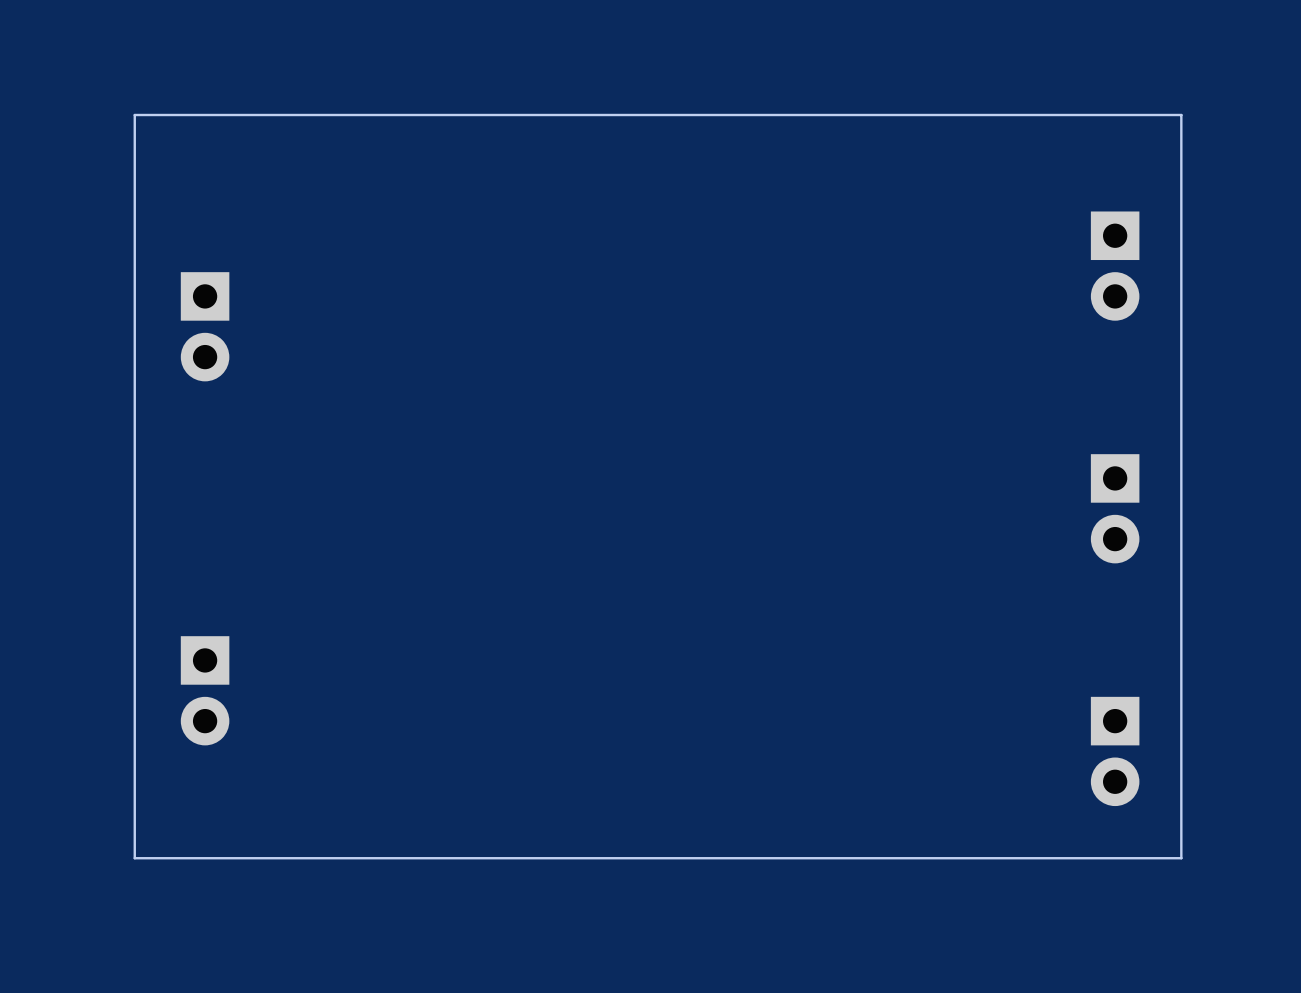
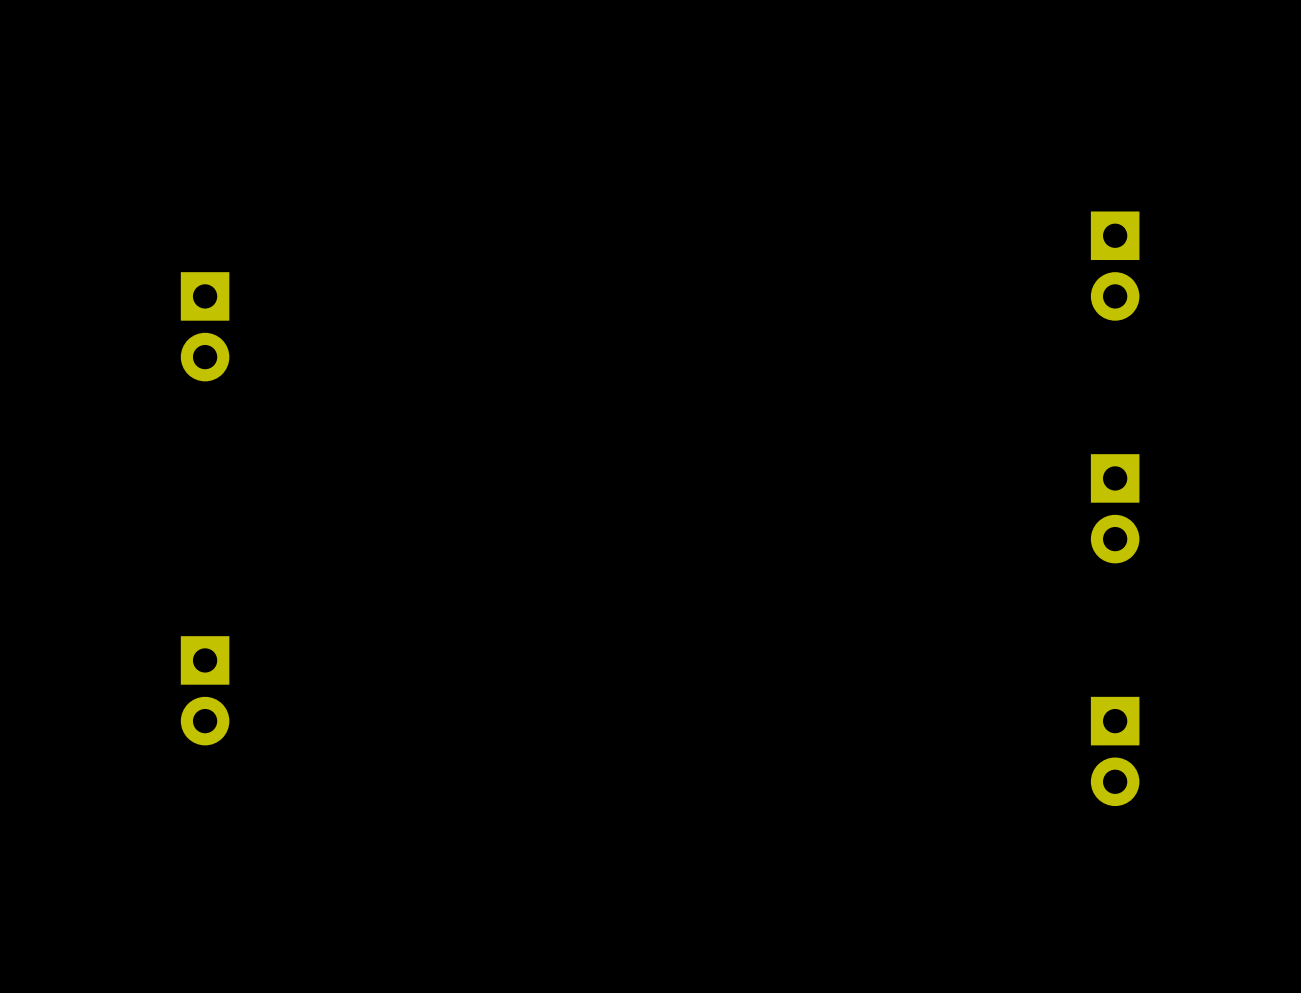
board edge: (1181, 115) (1181, 858) (134, 858) (134, 115) (1181, 115) -> none

